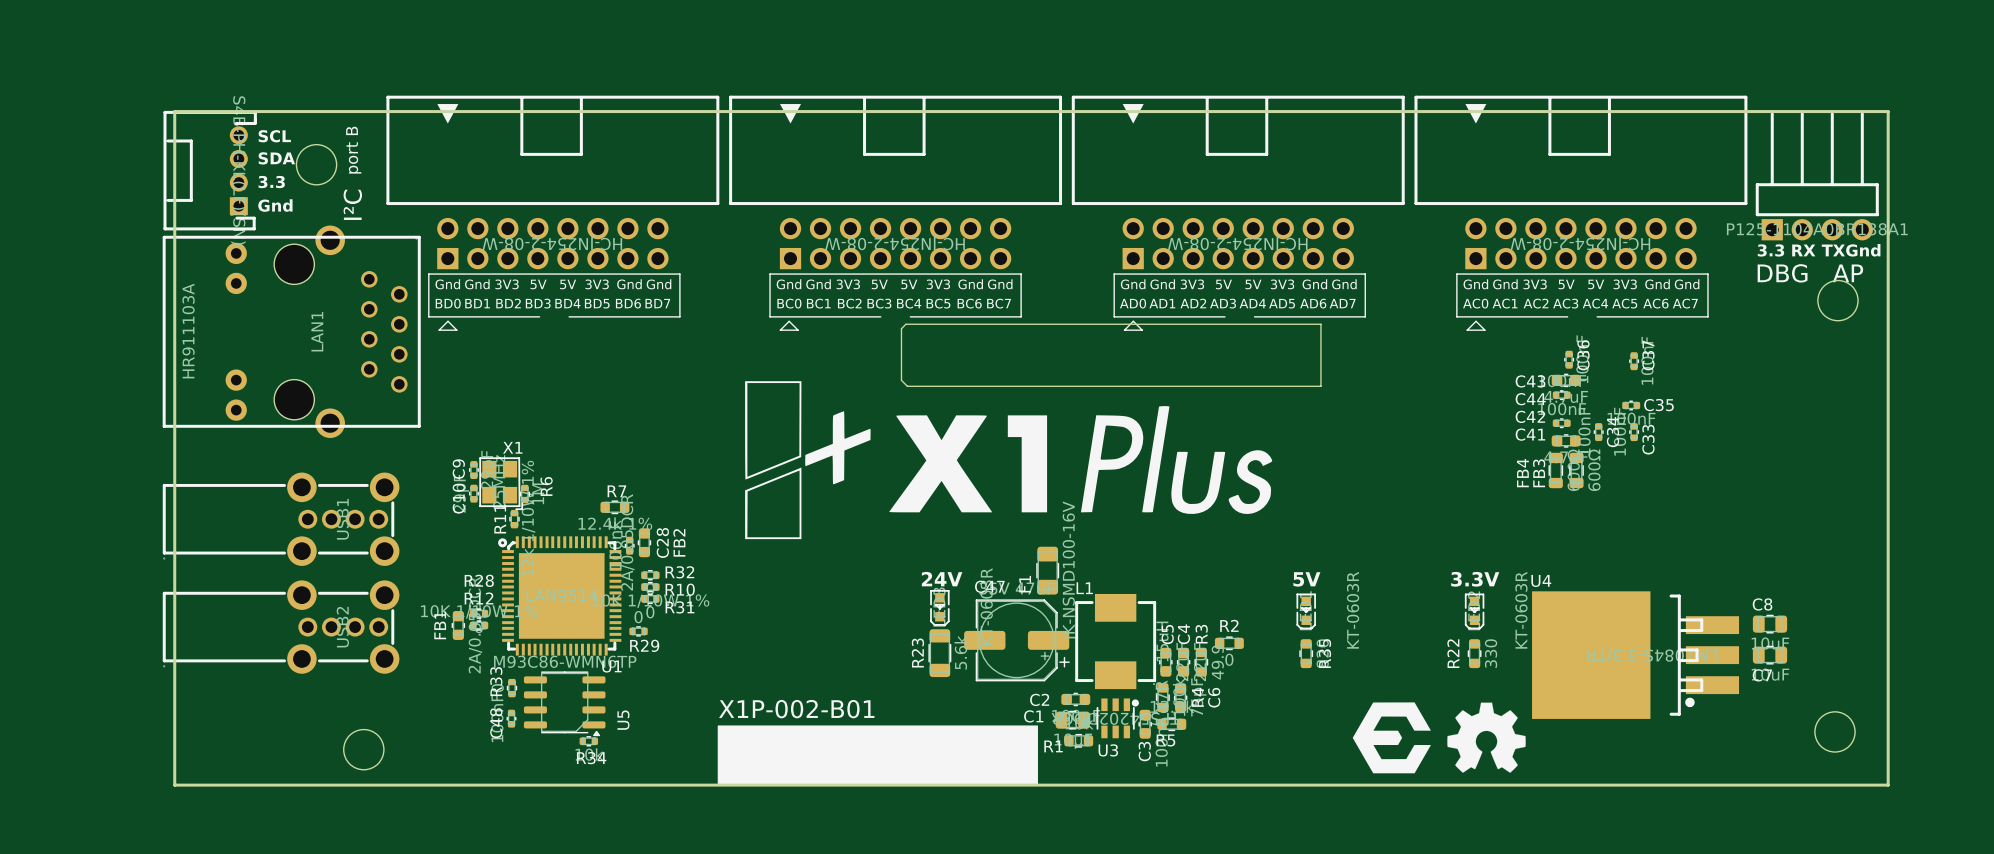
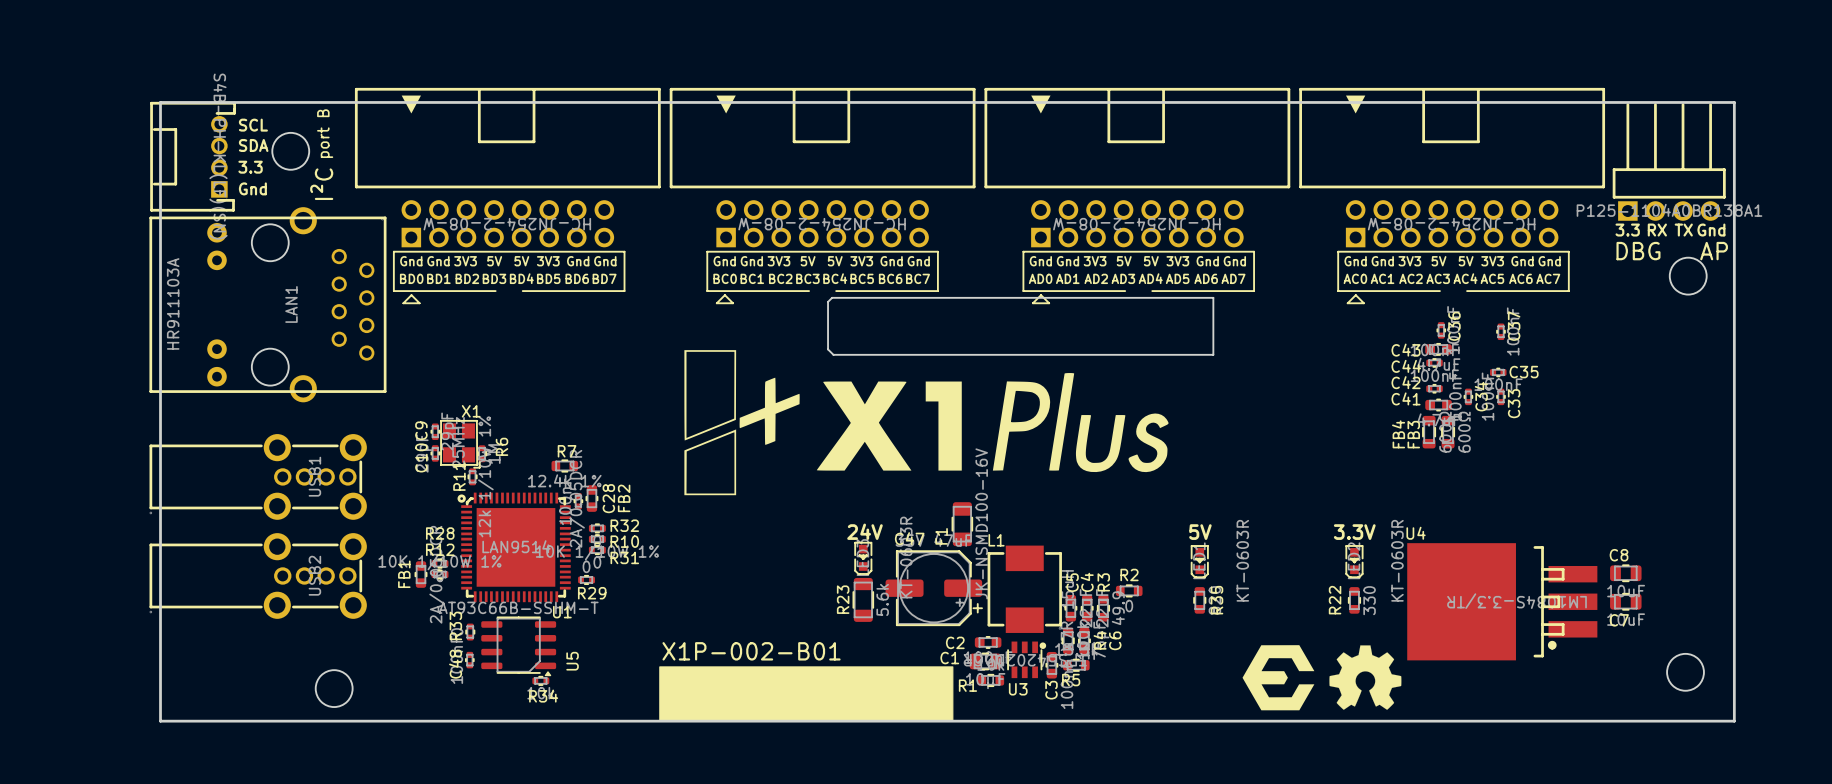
U5 value: M93C86-WMN6TP (565, 661) -> AT93C66B-SSHM-T (518, 607)

